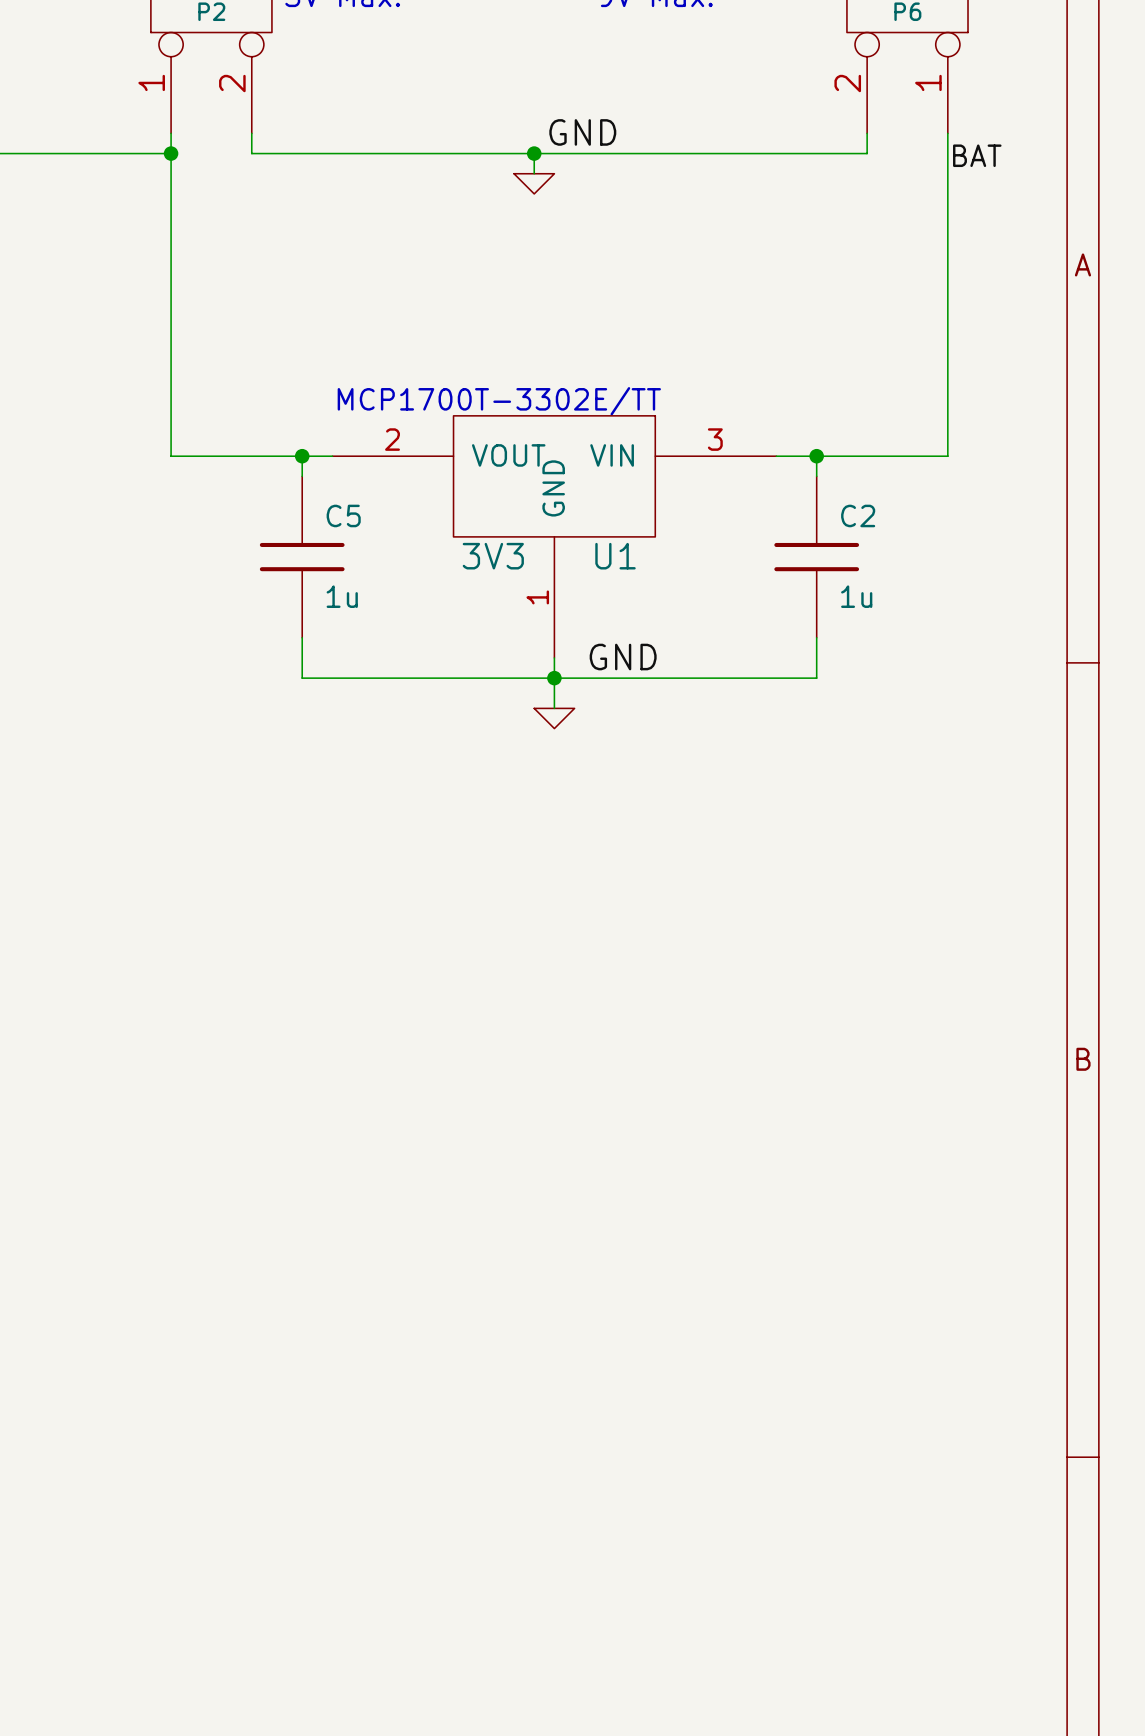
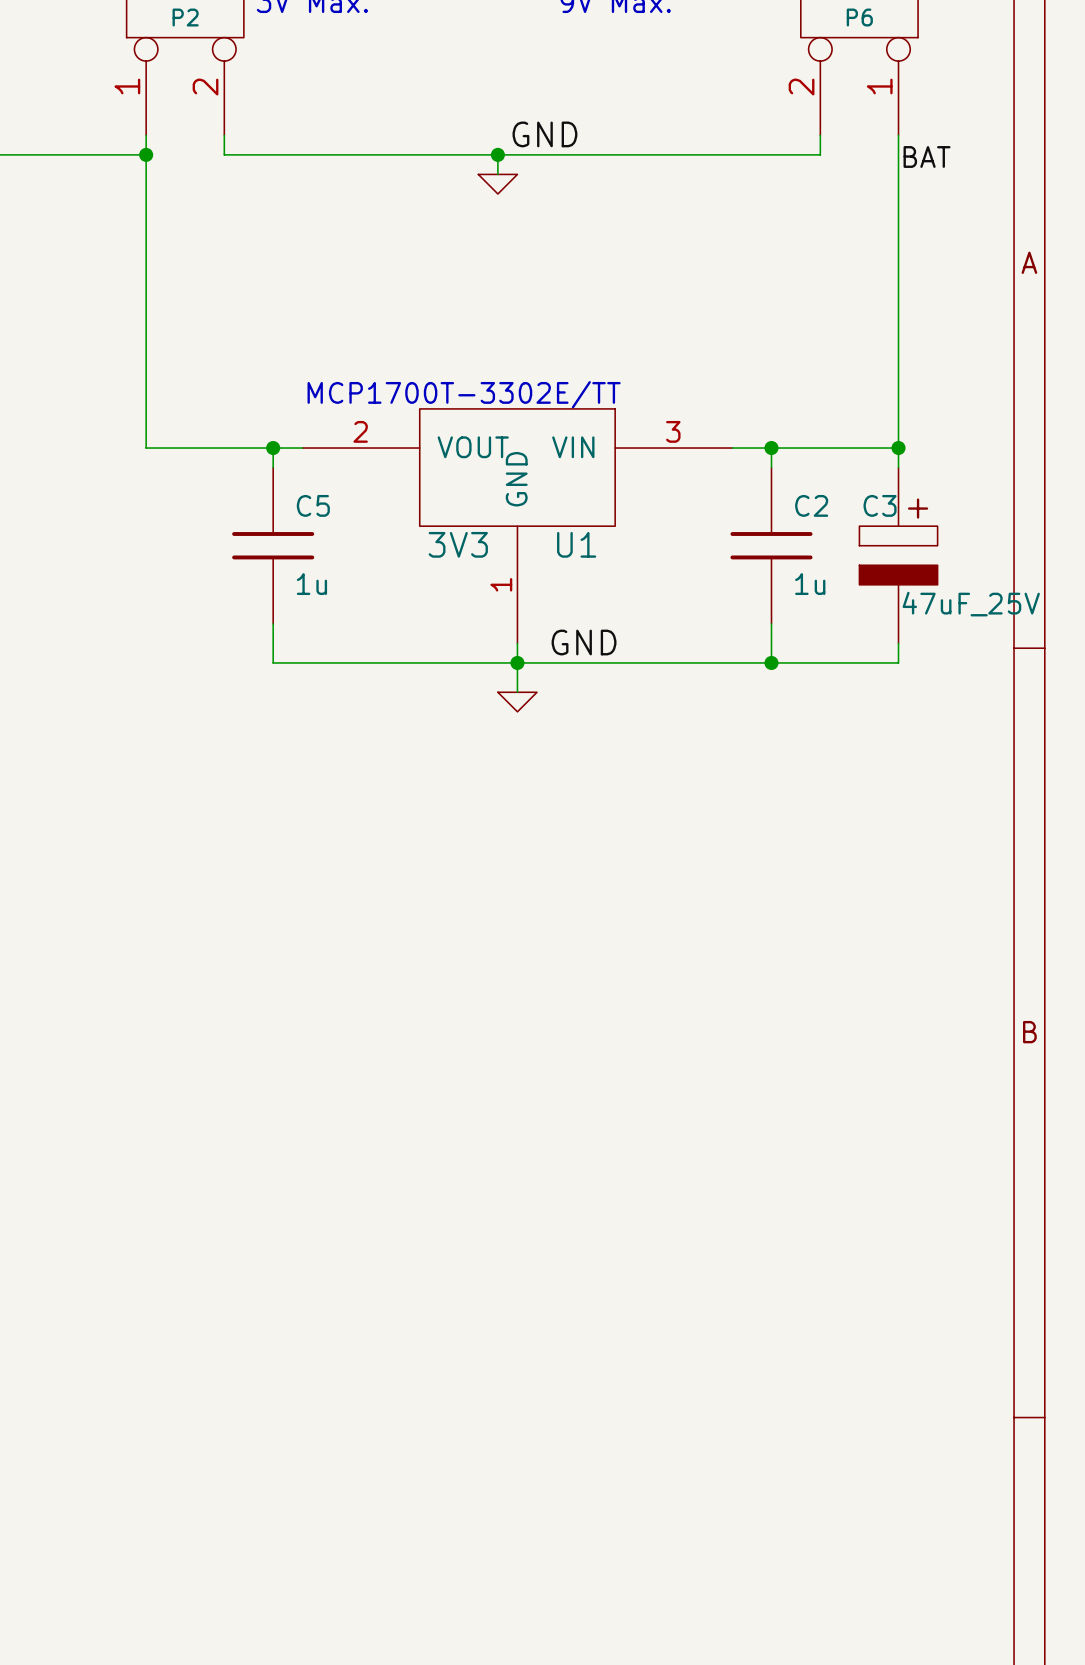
wire: none -> (898, 448) (898, 467)
junction: none -> (898, 448)
C3: none -> 47uF_25V (898, 555)
wire: none -> (898, 643) (898, 662) (771, 662)
junction: none -> (771, 662)

